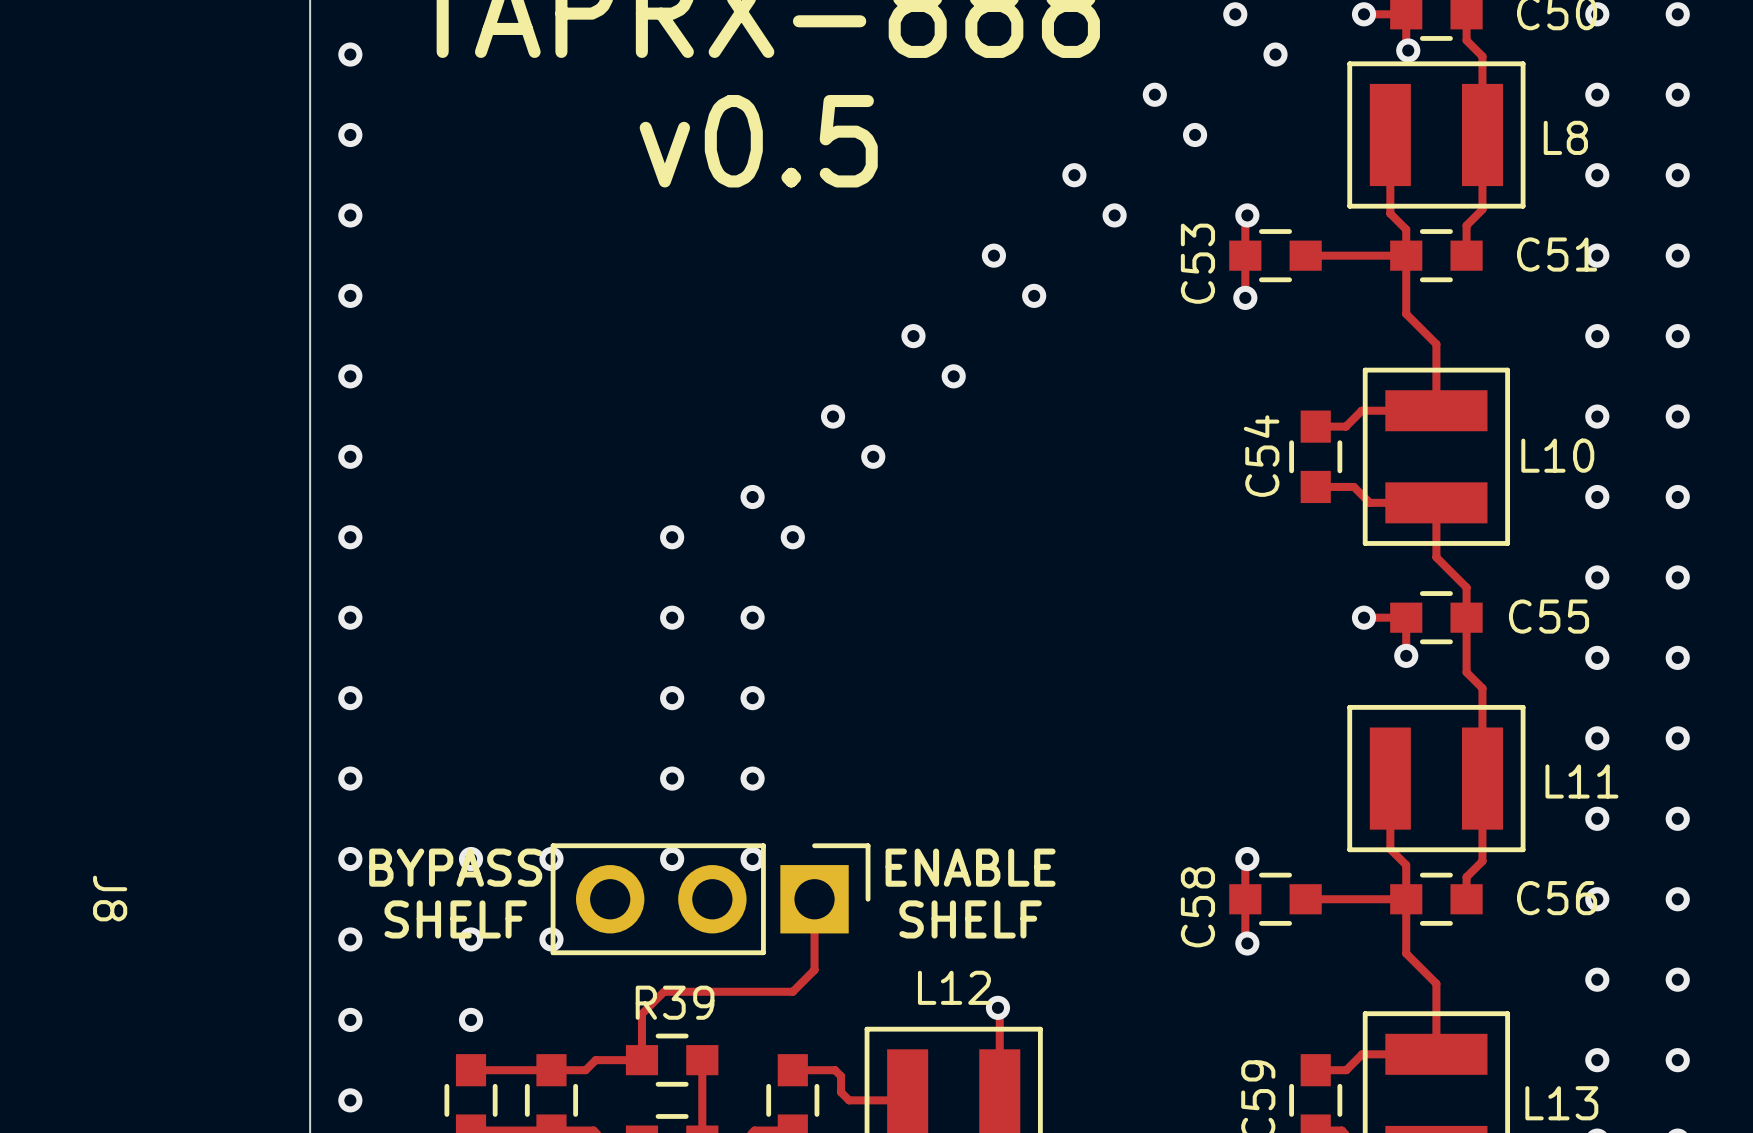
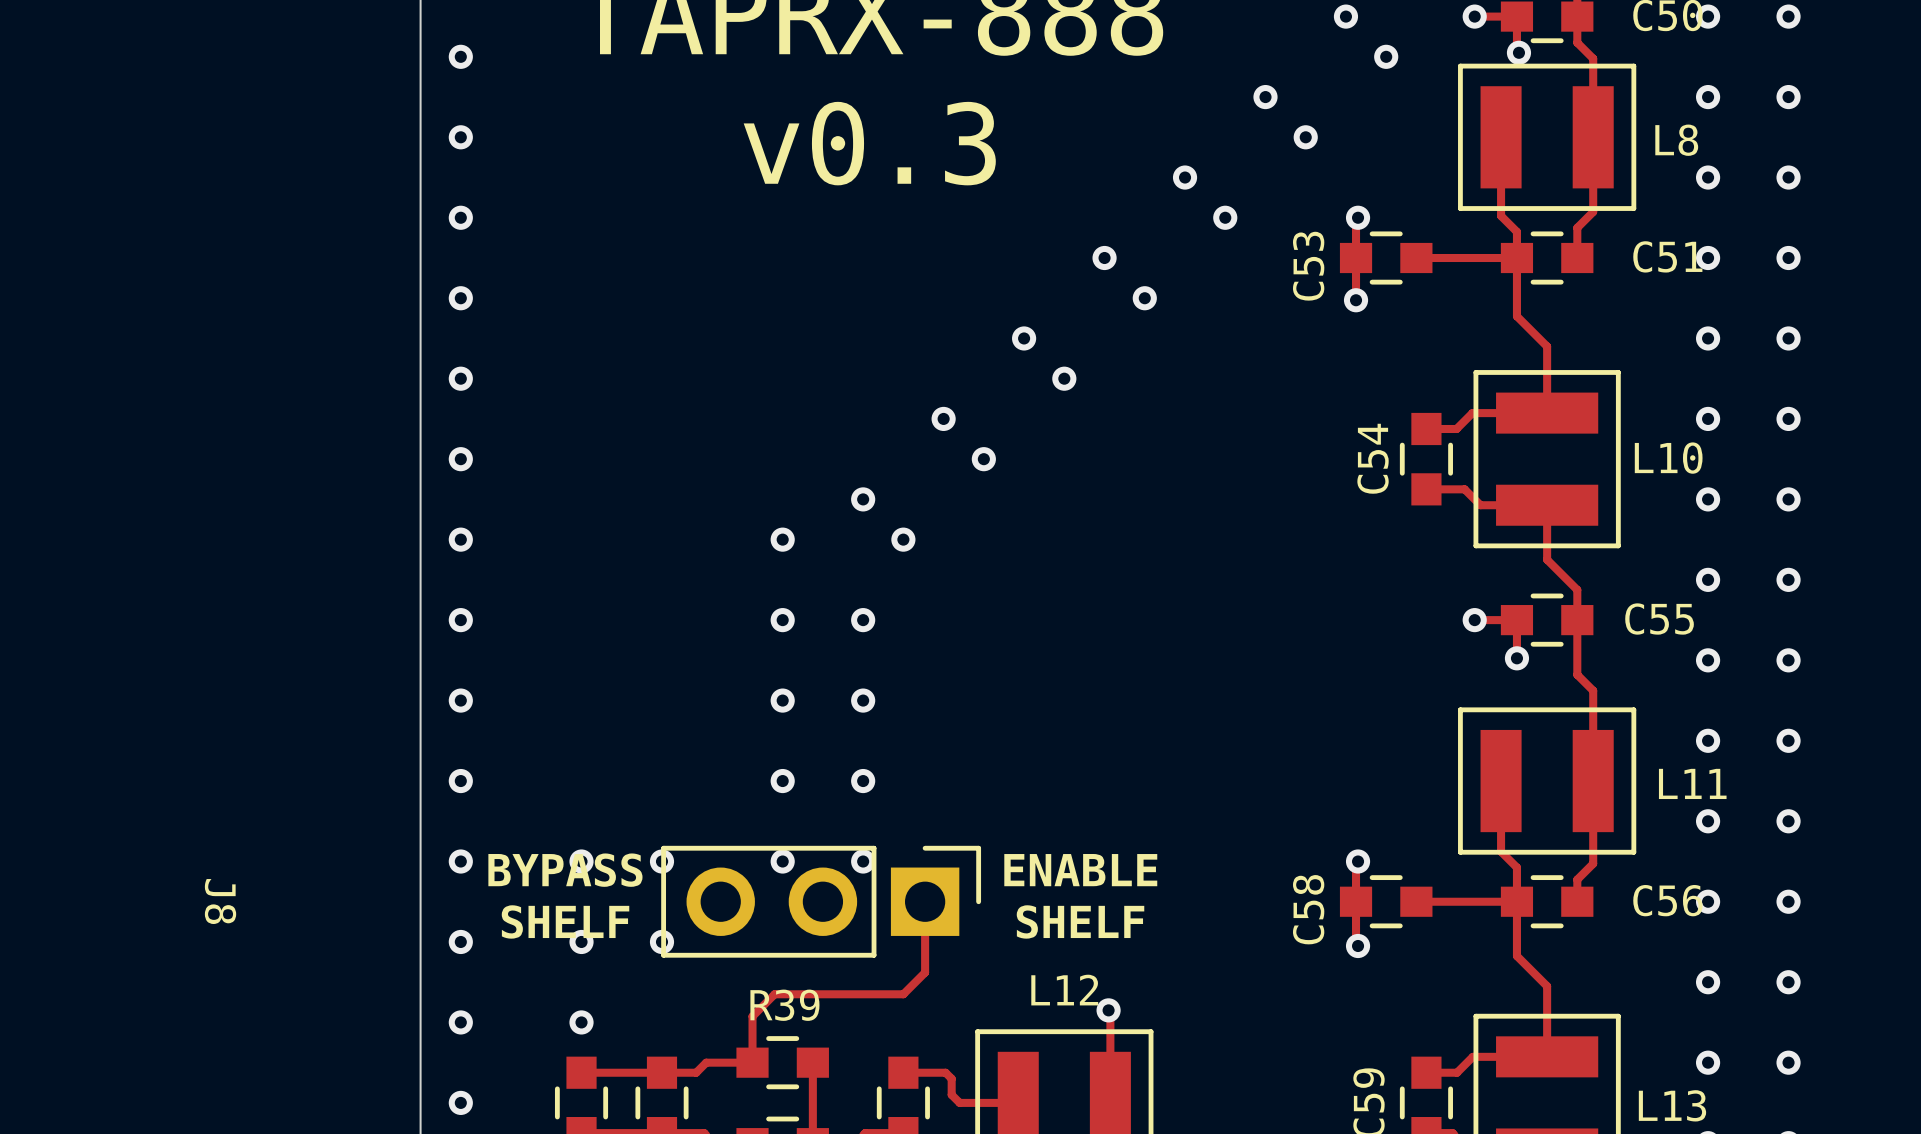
text: v0.5 (758, 141) -> v0.3 (869, 143)

